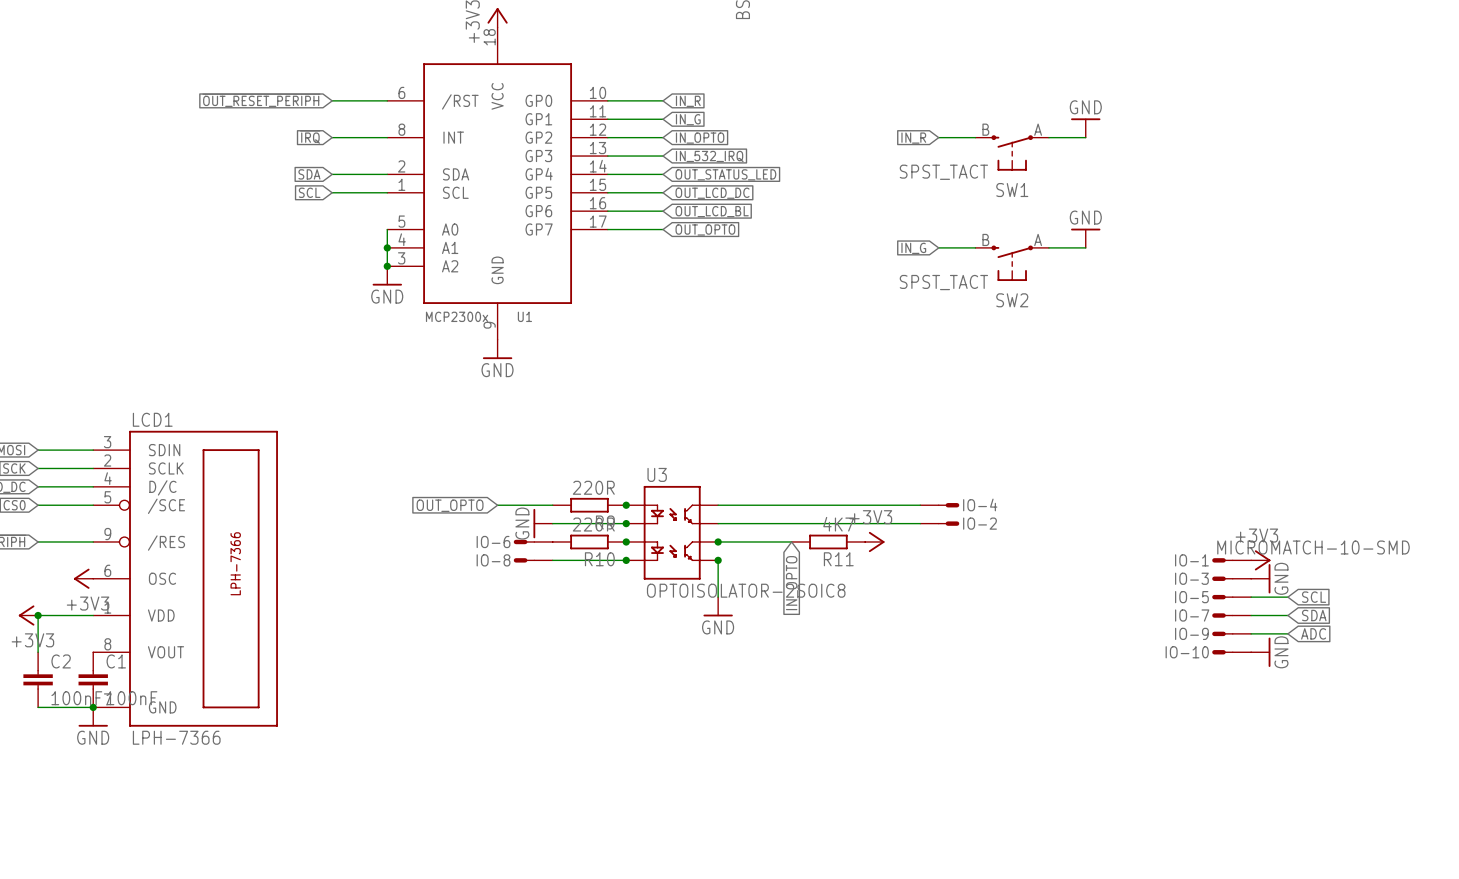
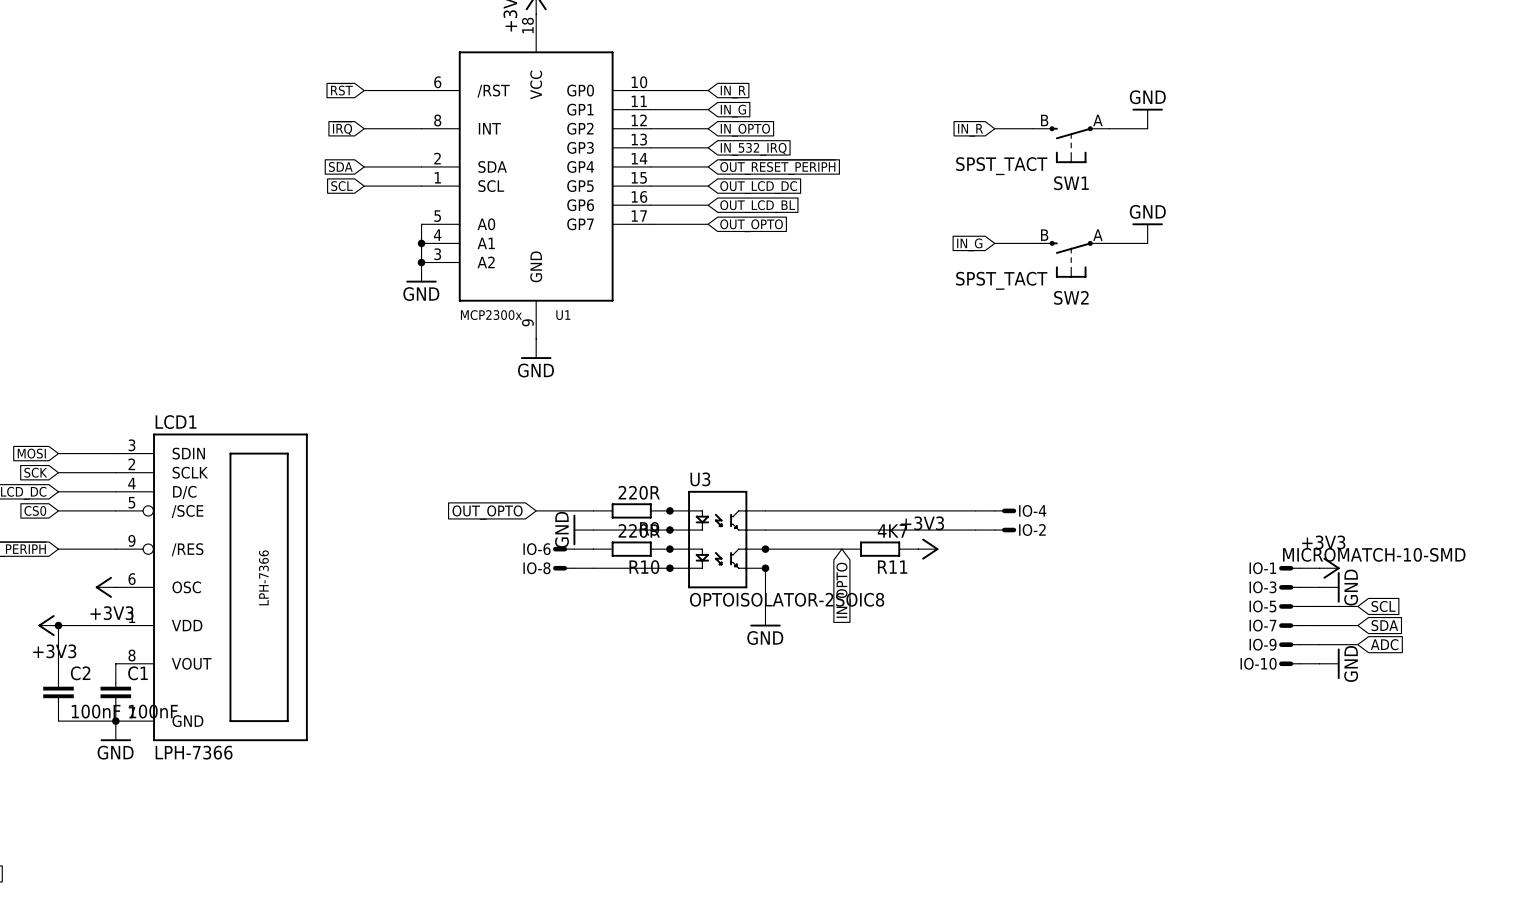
global label: ~{OUT_RESET_PERIPH} (261, 100) -> ~{RST} (341, 89)
global label: OUT_STATUS_LED (725, 174) -> ~{OUT_RESET_PERIPH} (777, 167)

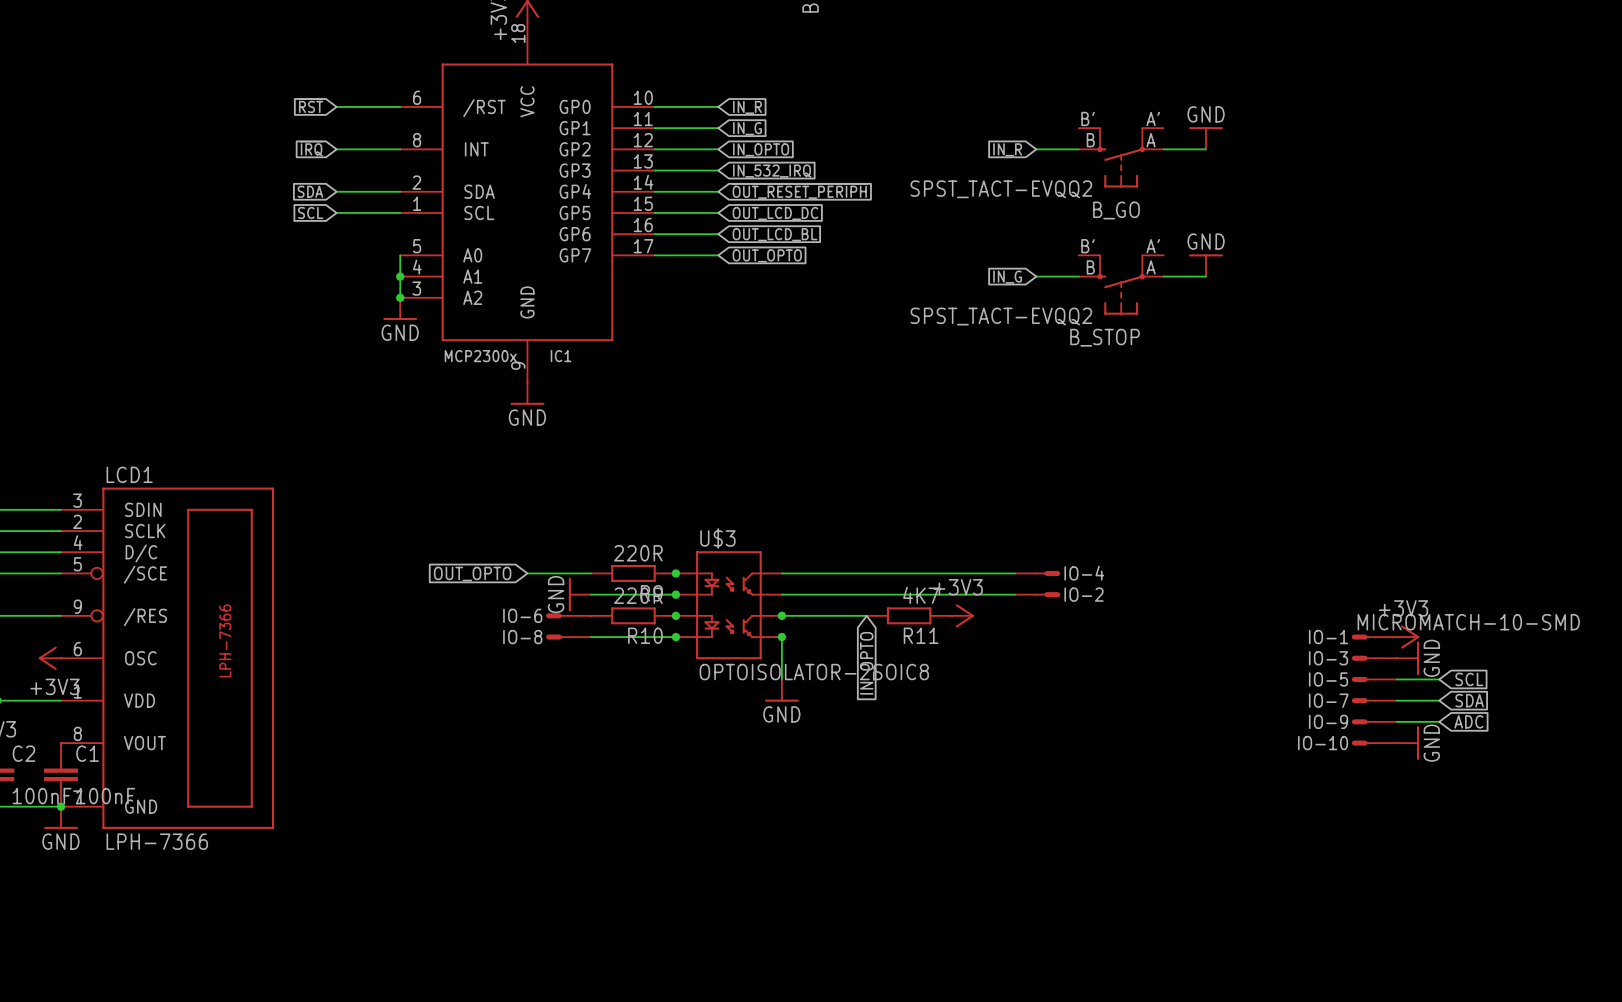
B_GO: none -> SPST_TACT-EVQQ2 (1121, 157)
SW1: SPST_TACT (1071, 144) -> none
B_STOP: none -> SPST_TACT-EVQQ2 (1121, 284)
SW2: SPST_TACT (1071, 259) -> none
U1 name: U1 (563, 315) -> IC1 (561, 356)
U3 name: U3 (700, 479) -> U$3 (717, 538)

